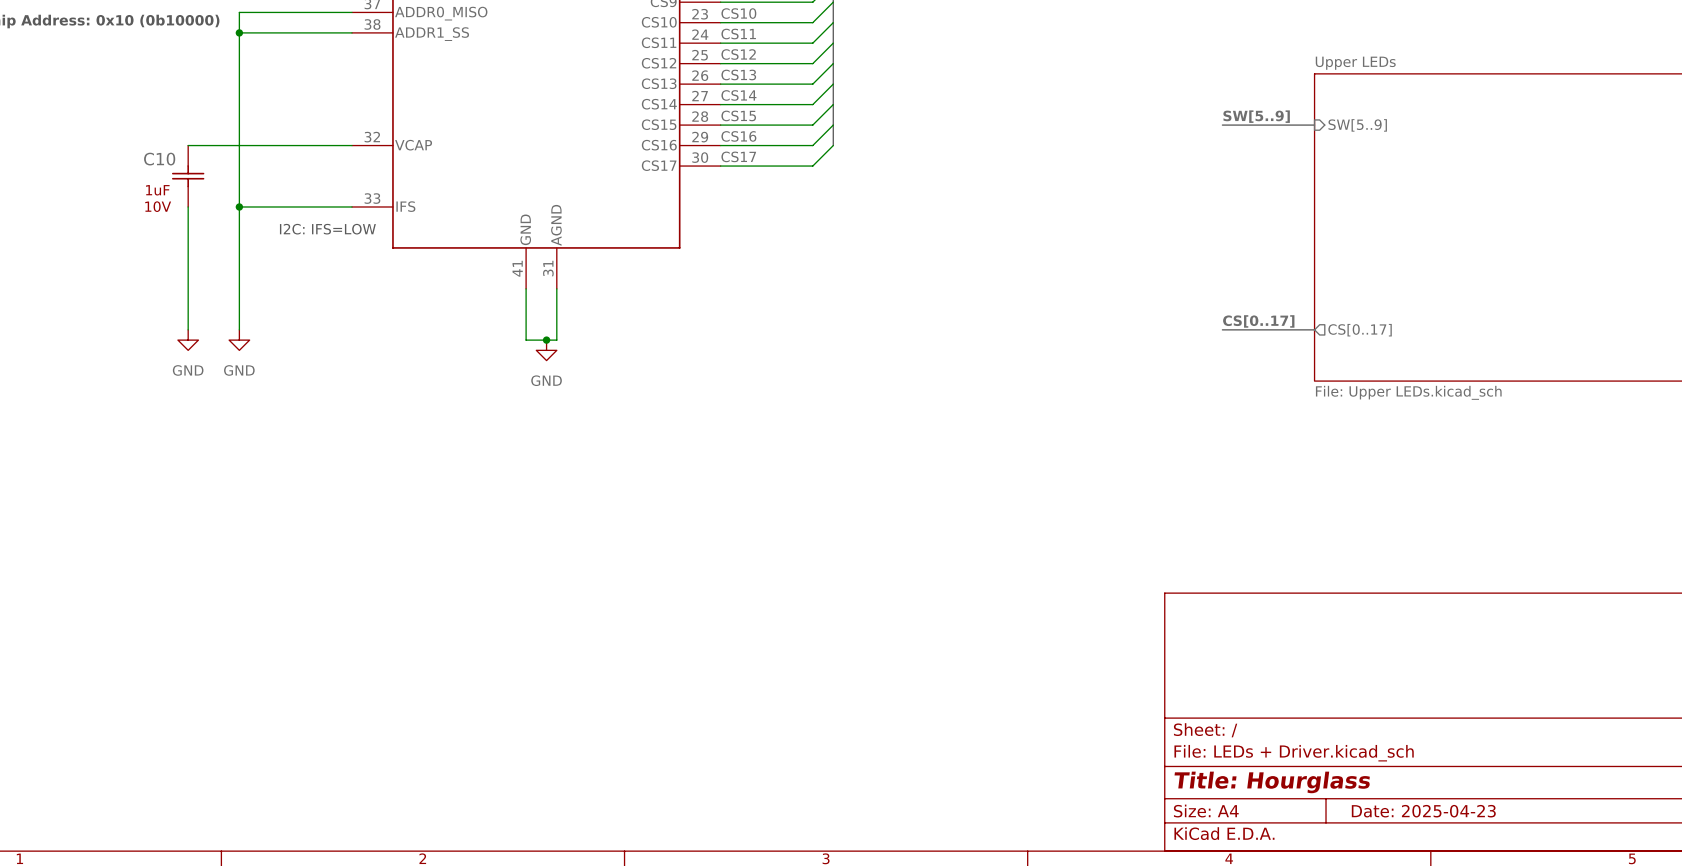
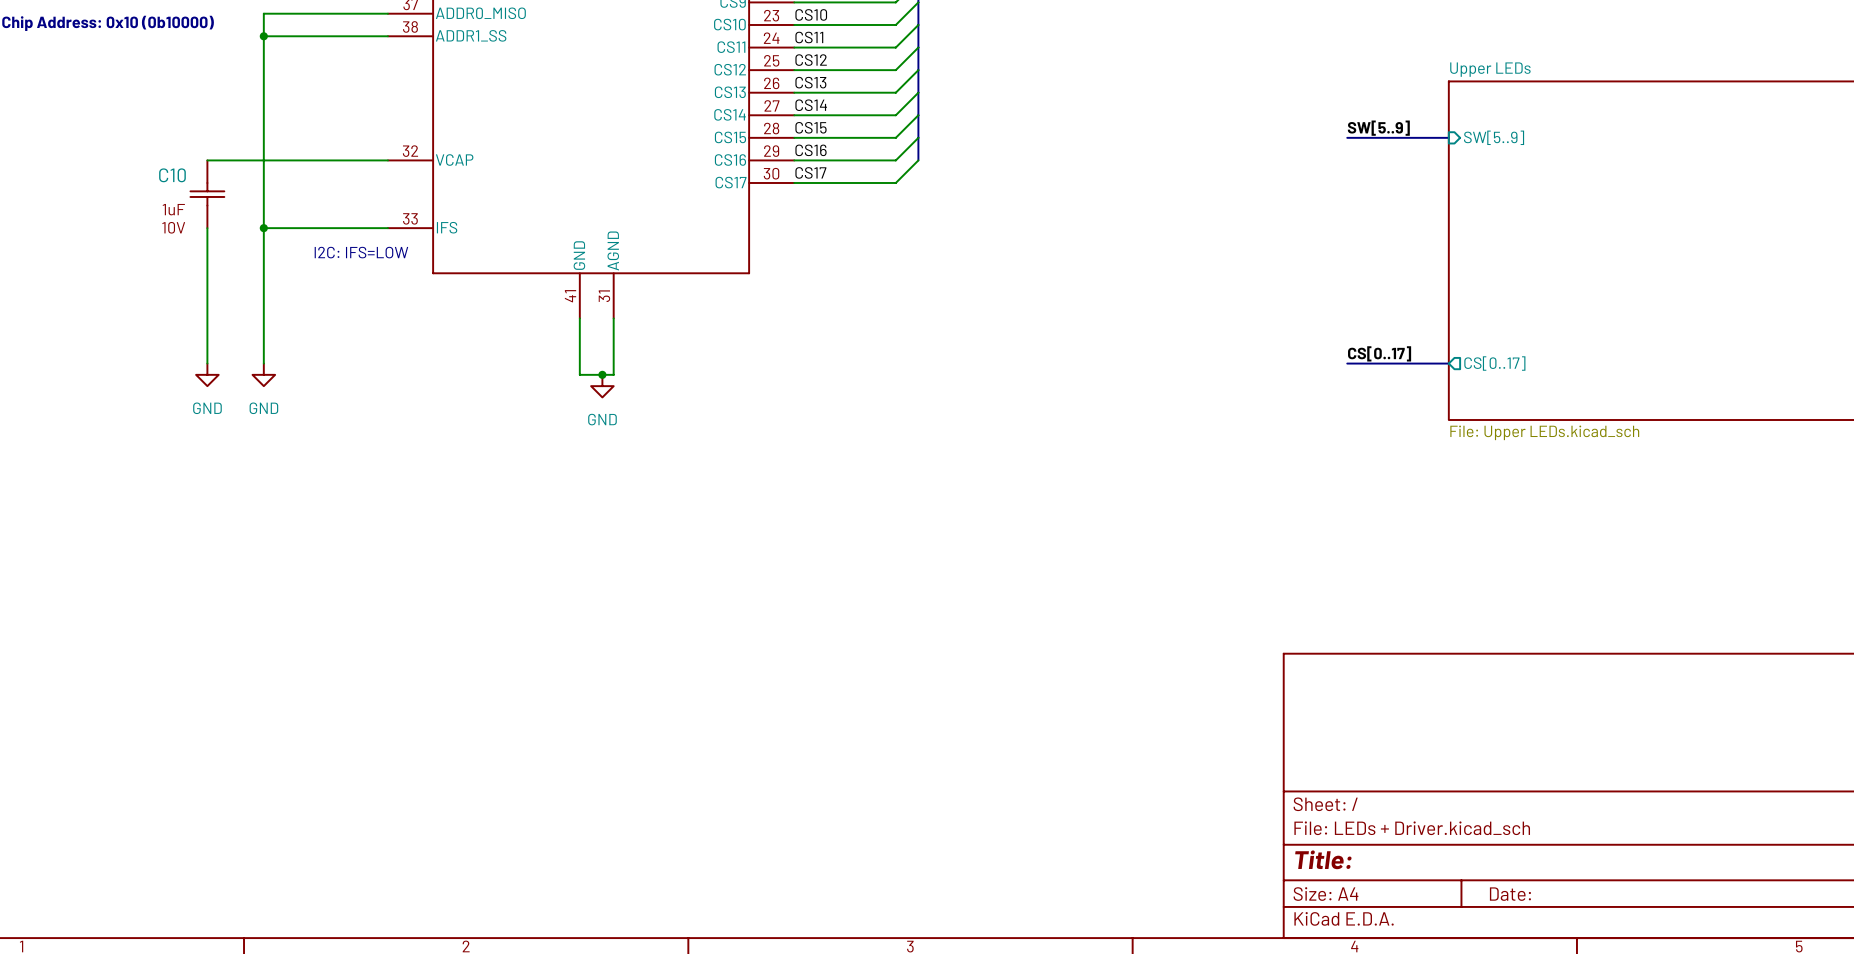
title block: Title: Hourglass (1272, 782) -> Title: (1323, 859)
title block: Date: 2025-04-23 (1423, 811) -> Date: (1510, 894)

